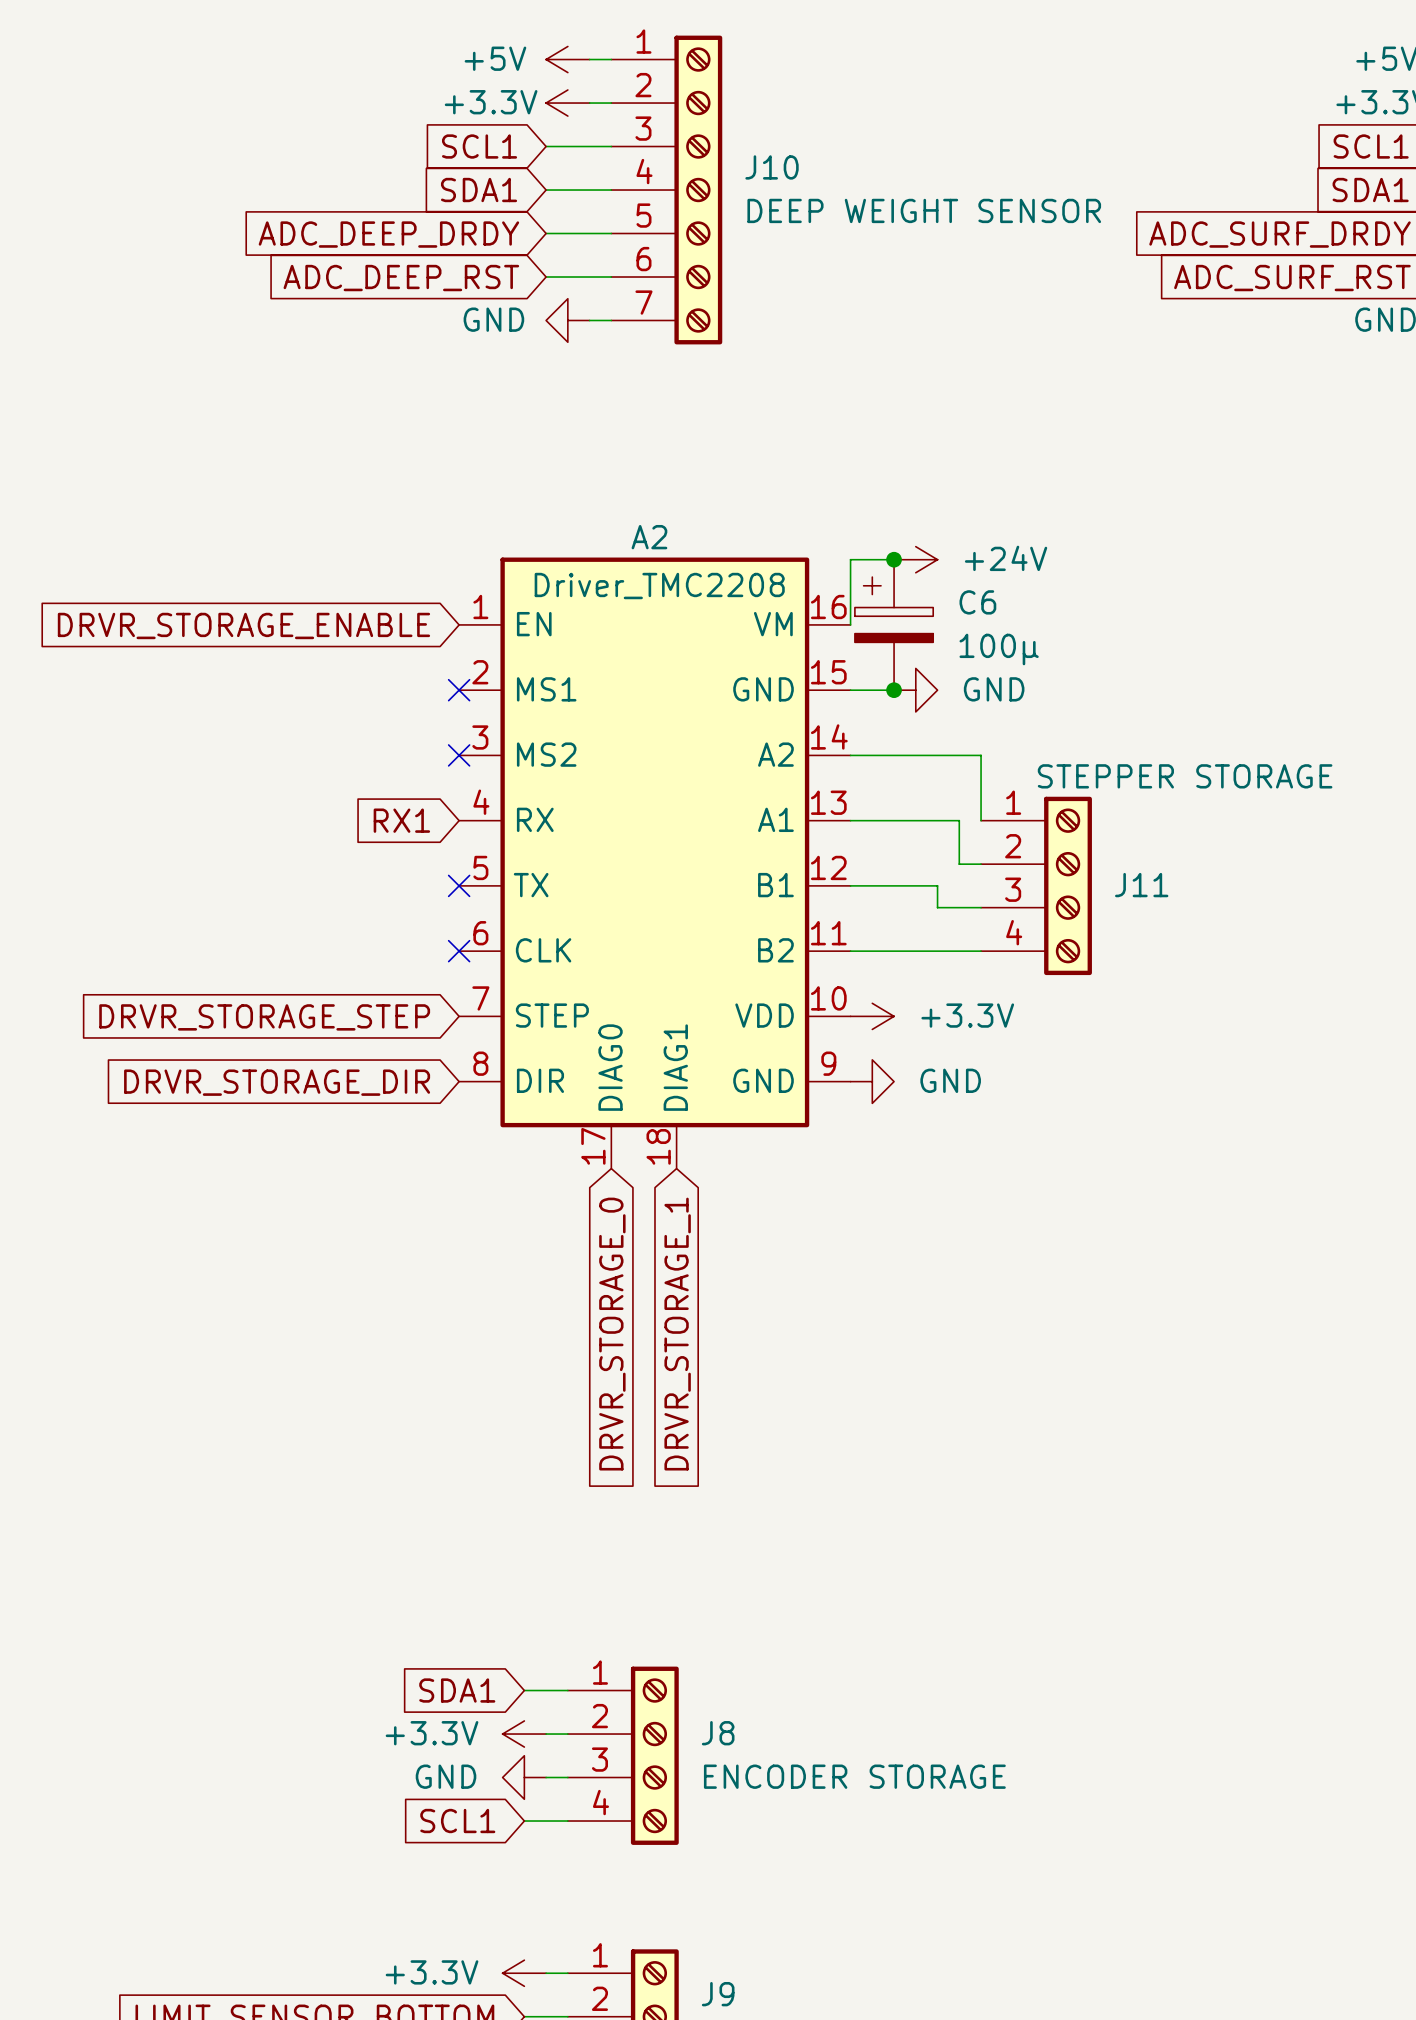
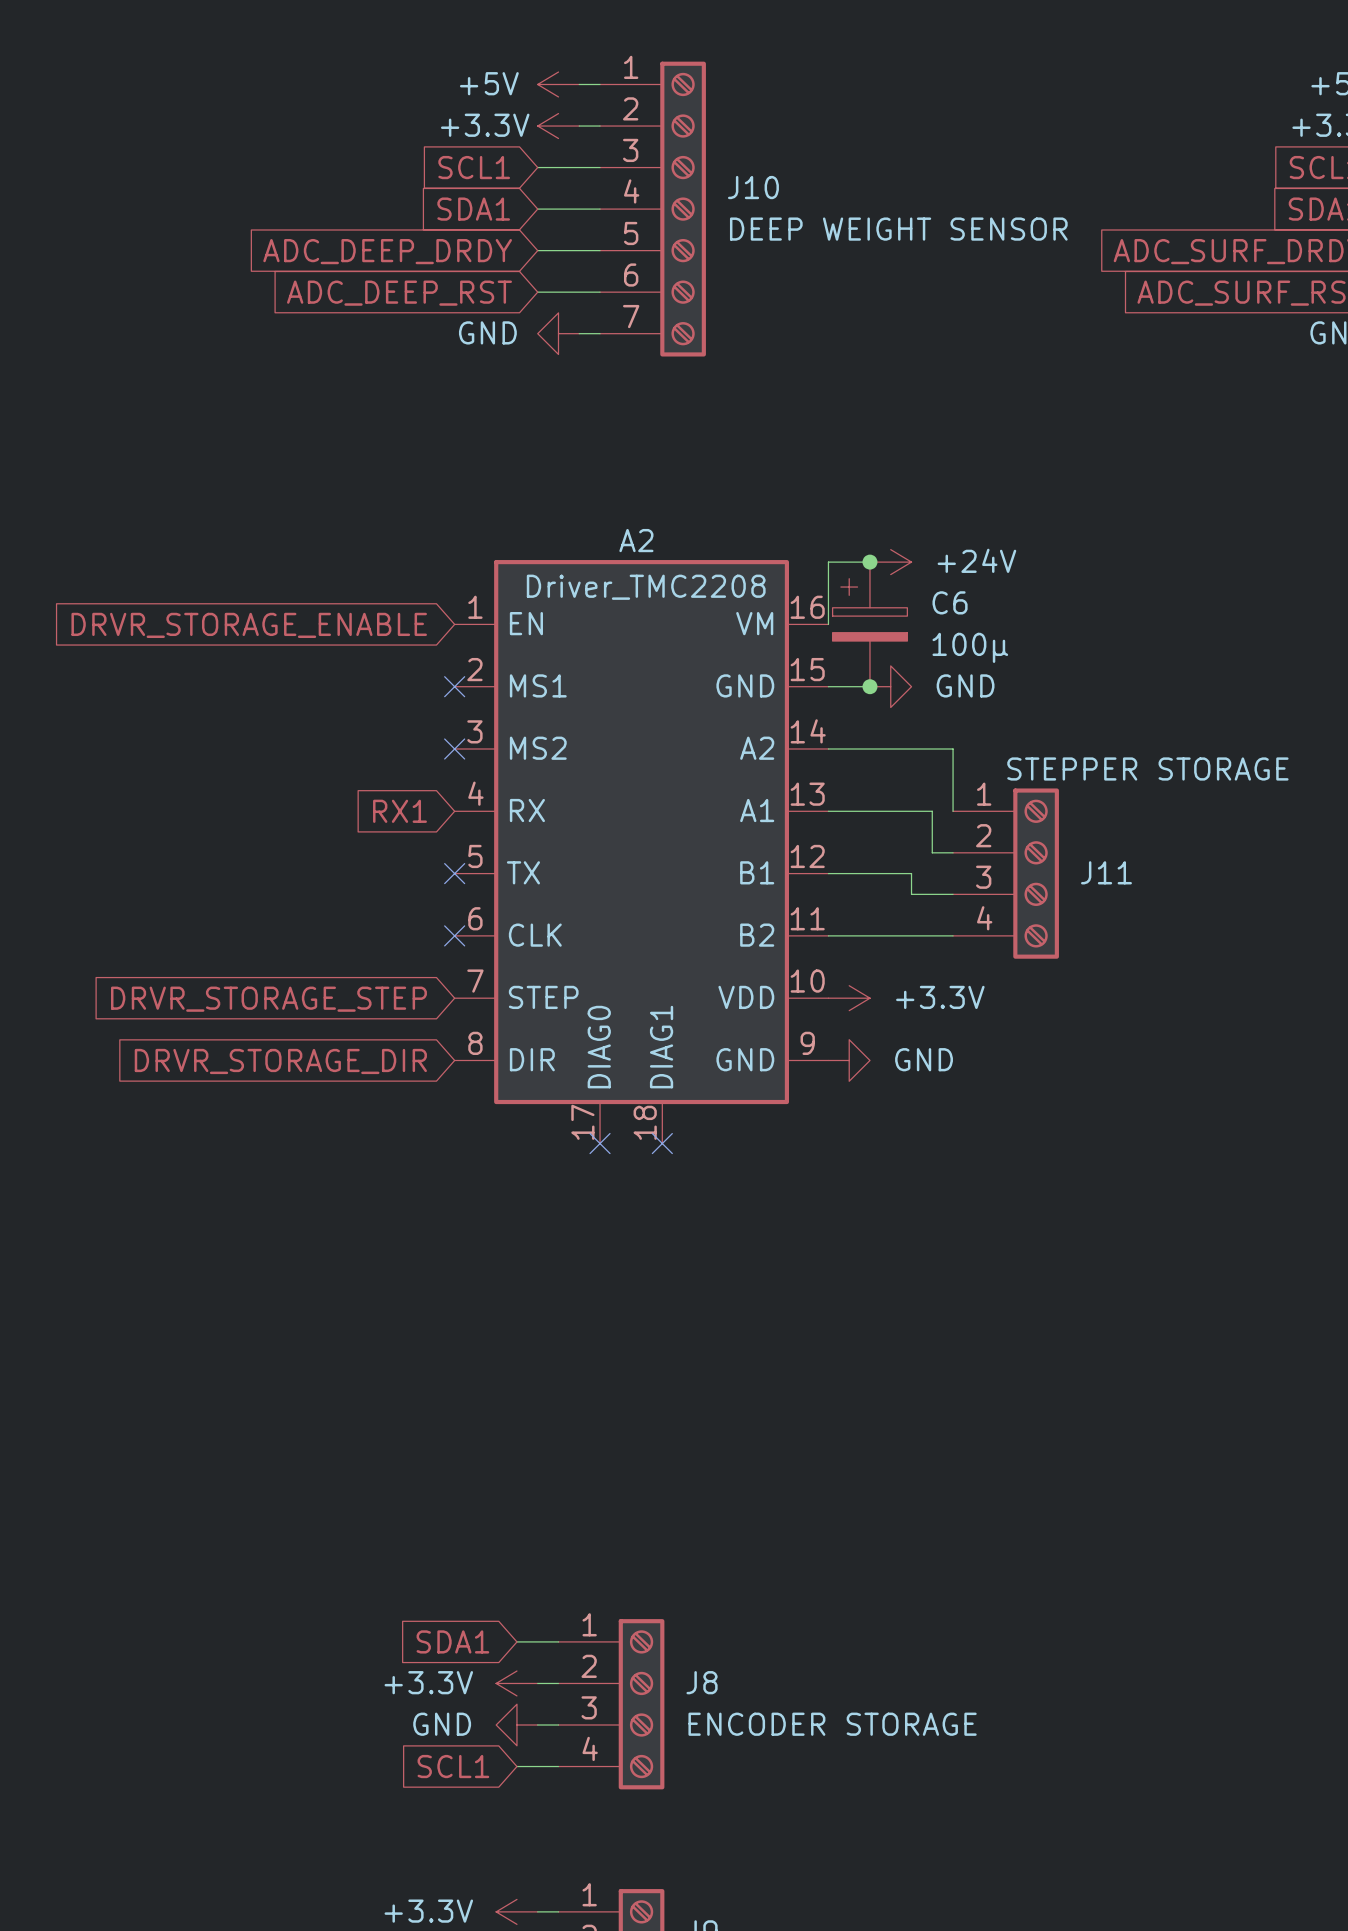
no-connect mark: none -> (600, 1143)
no-connect mark: none -> (662, 1143)
global label: DRVR_STORAGE_0 (612, 1334) -> none
global label: DRVR_STORAGE_1 (677, 1334) -> none

